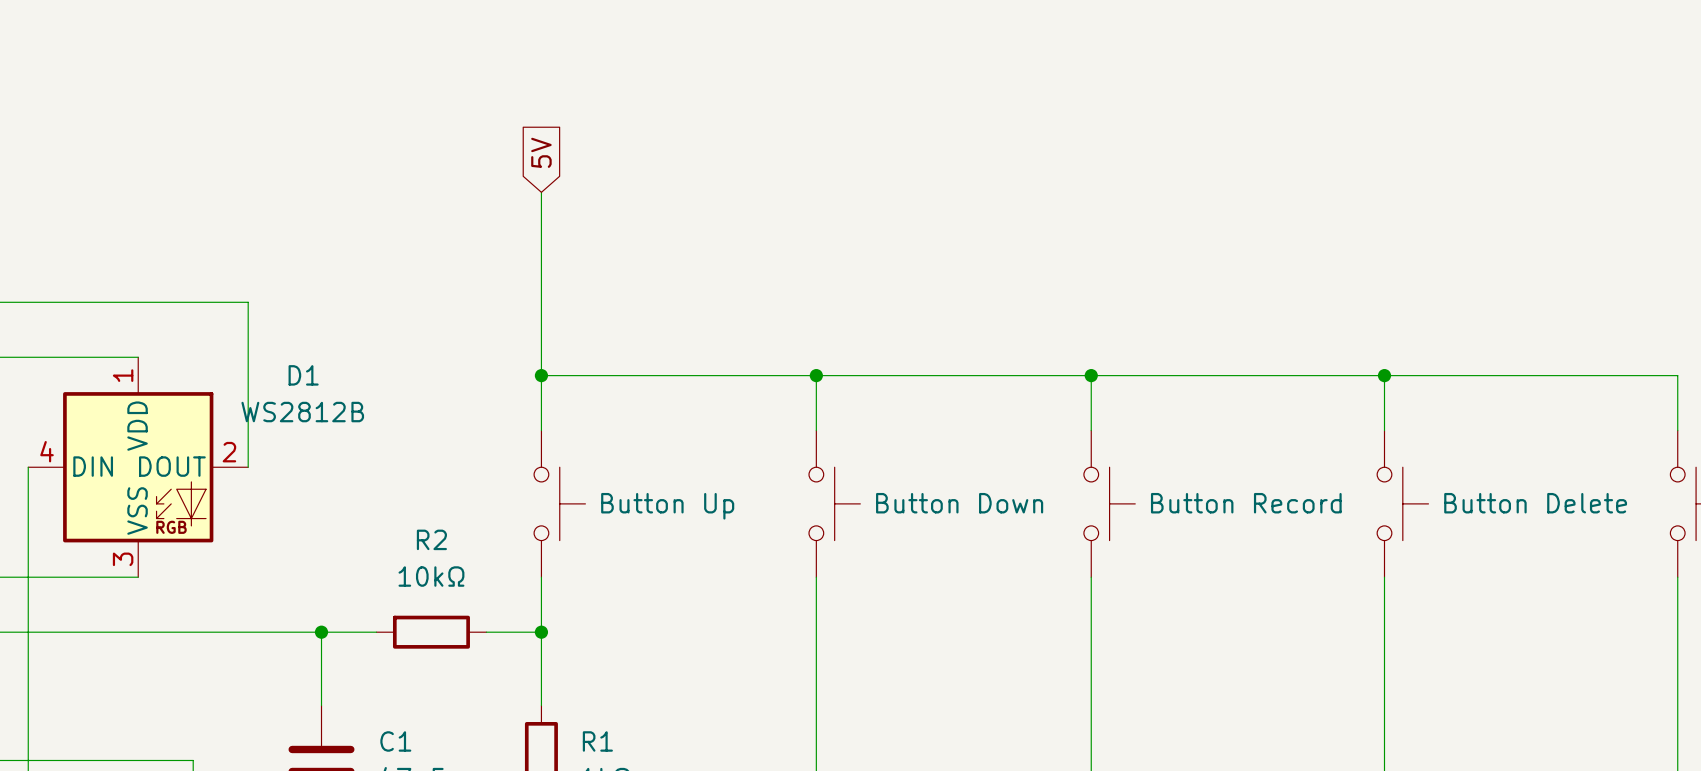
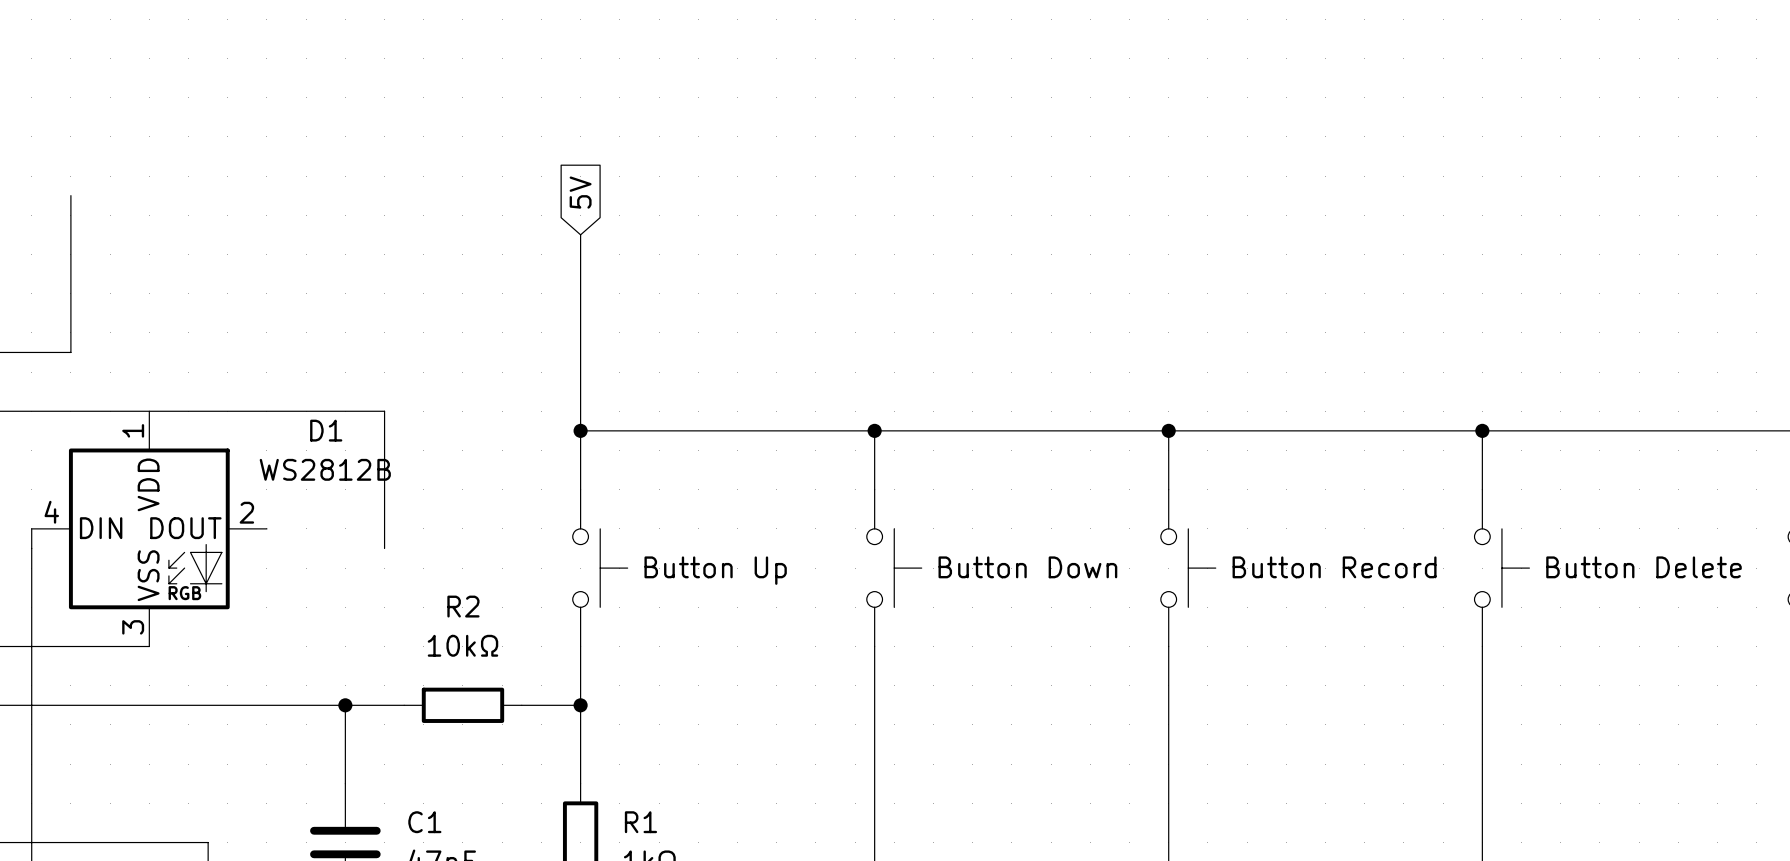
wire: (64, 302) (248, 302) (248, 467) -> (70, 352) (70, 195)
wire: none -> (149, 411) (384, 411) (384, 548)

